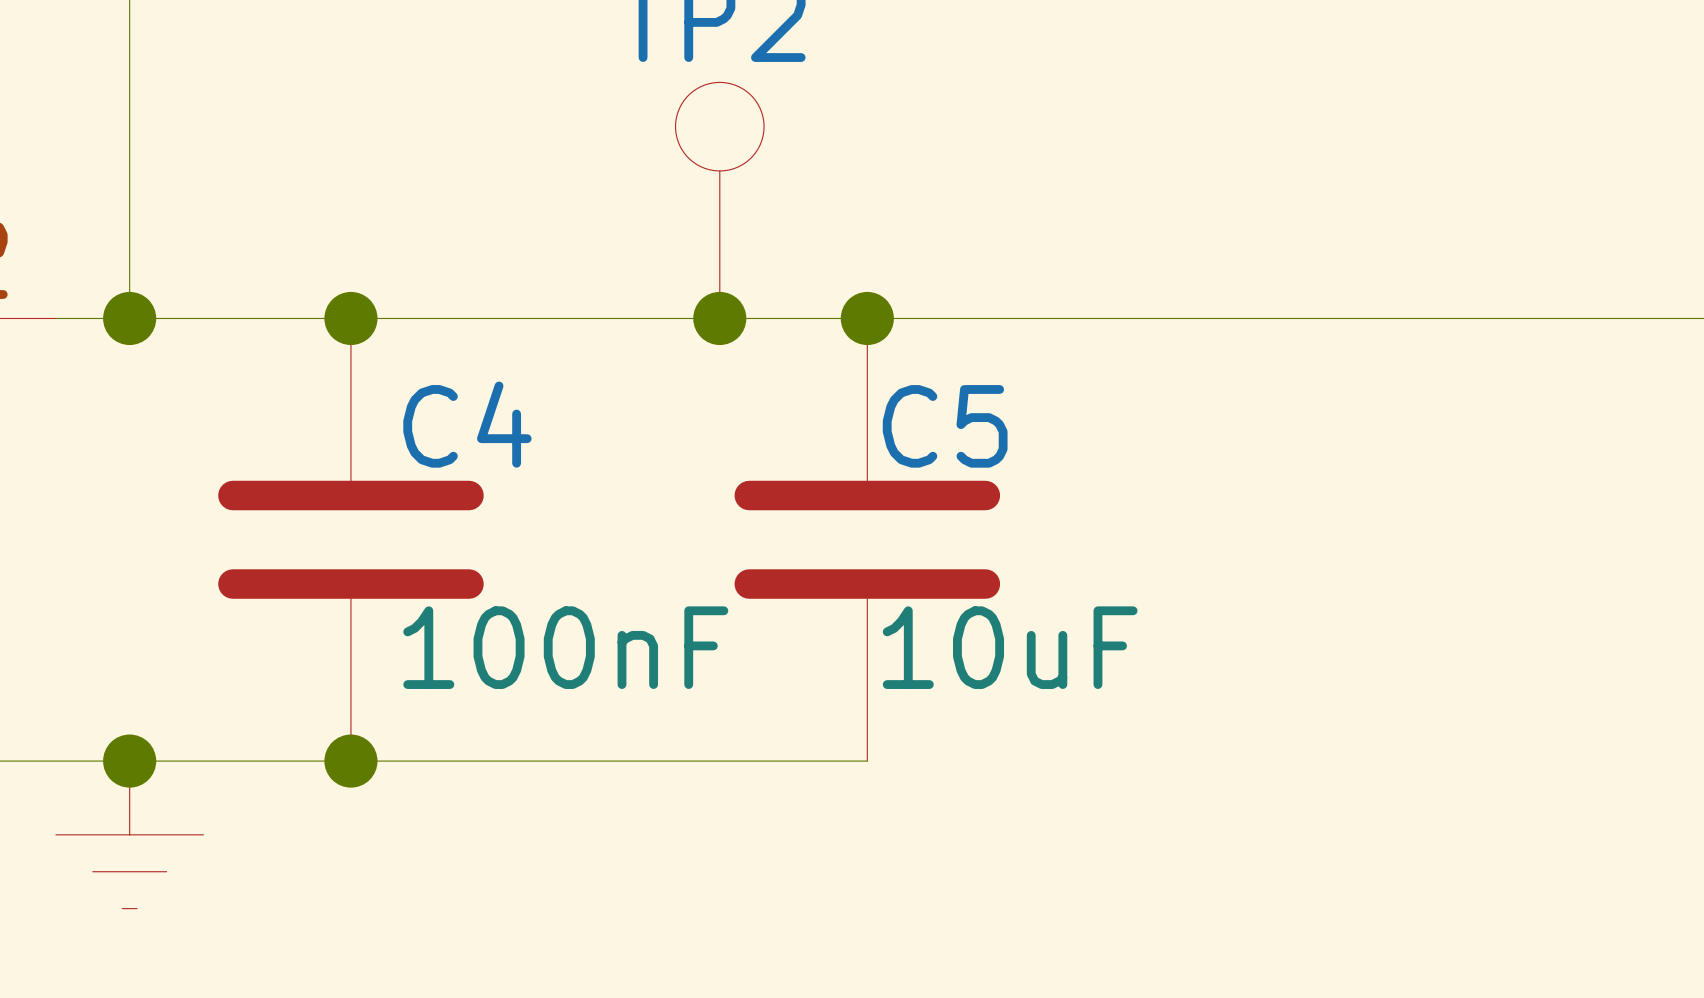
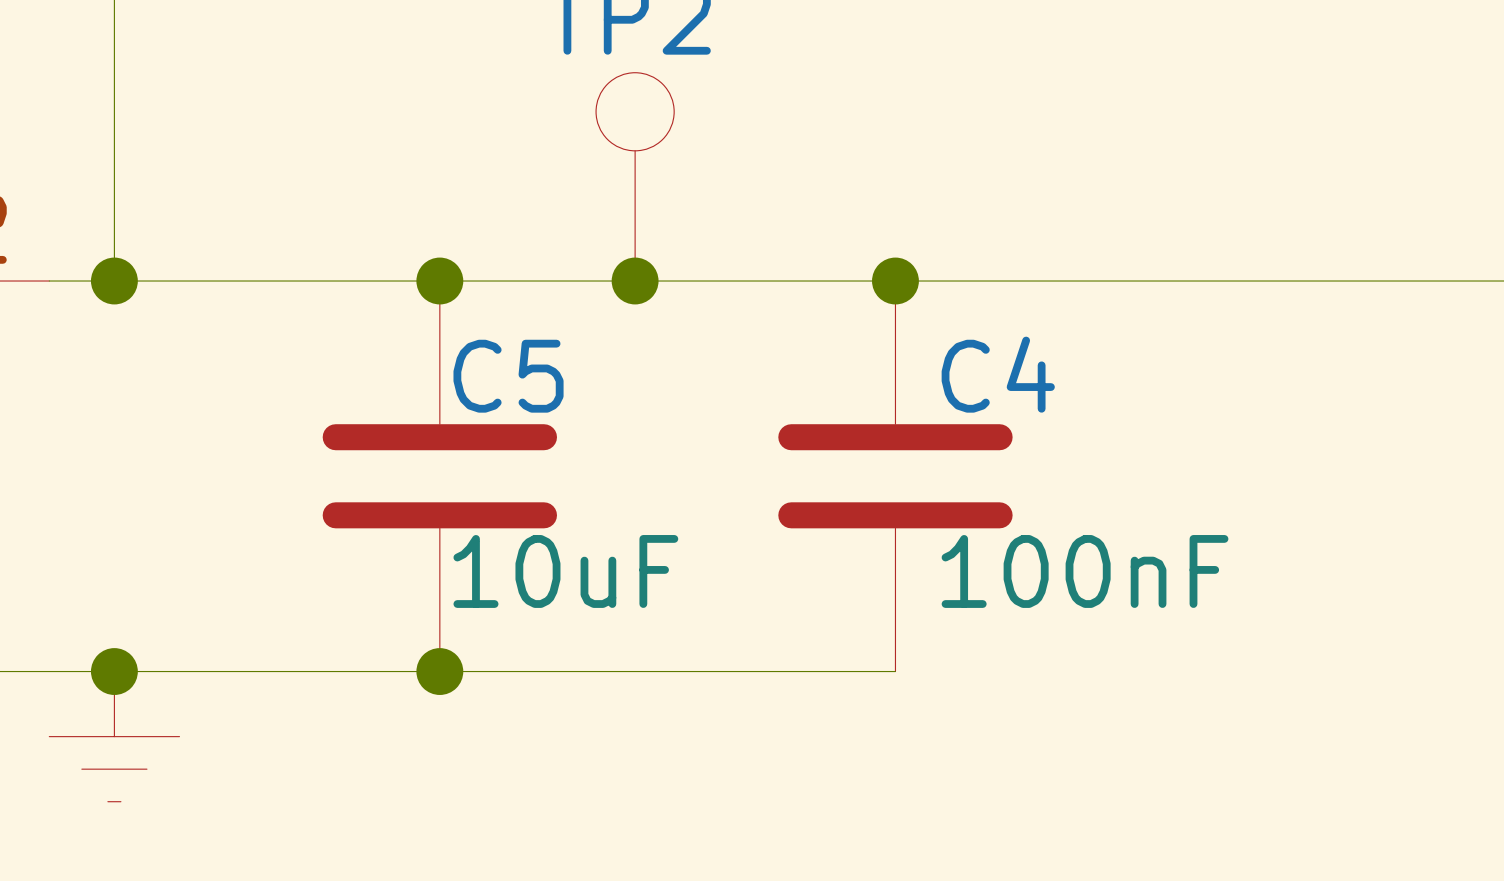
junction position: (350, 318) -> (439, 281)
junction position: (867, 318) -> (895, 281)
C4 position: (350, 539) -> (895, 476)
C5 position: (867, 539) -> (439, 476)
junction position: (350, 761) -> (439, 671)
wire: none -> (765, 671) (895, 671)

